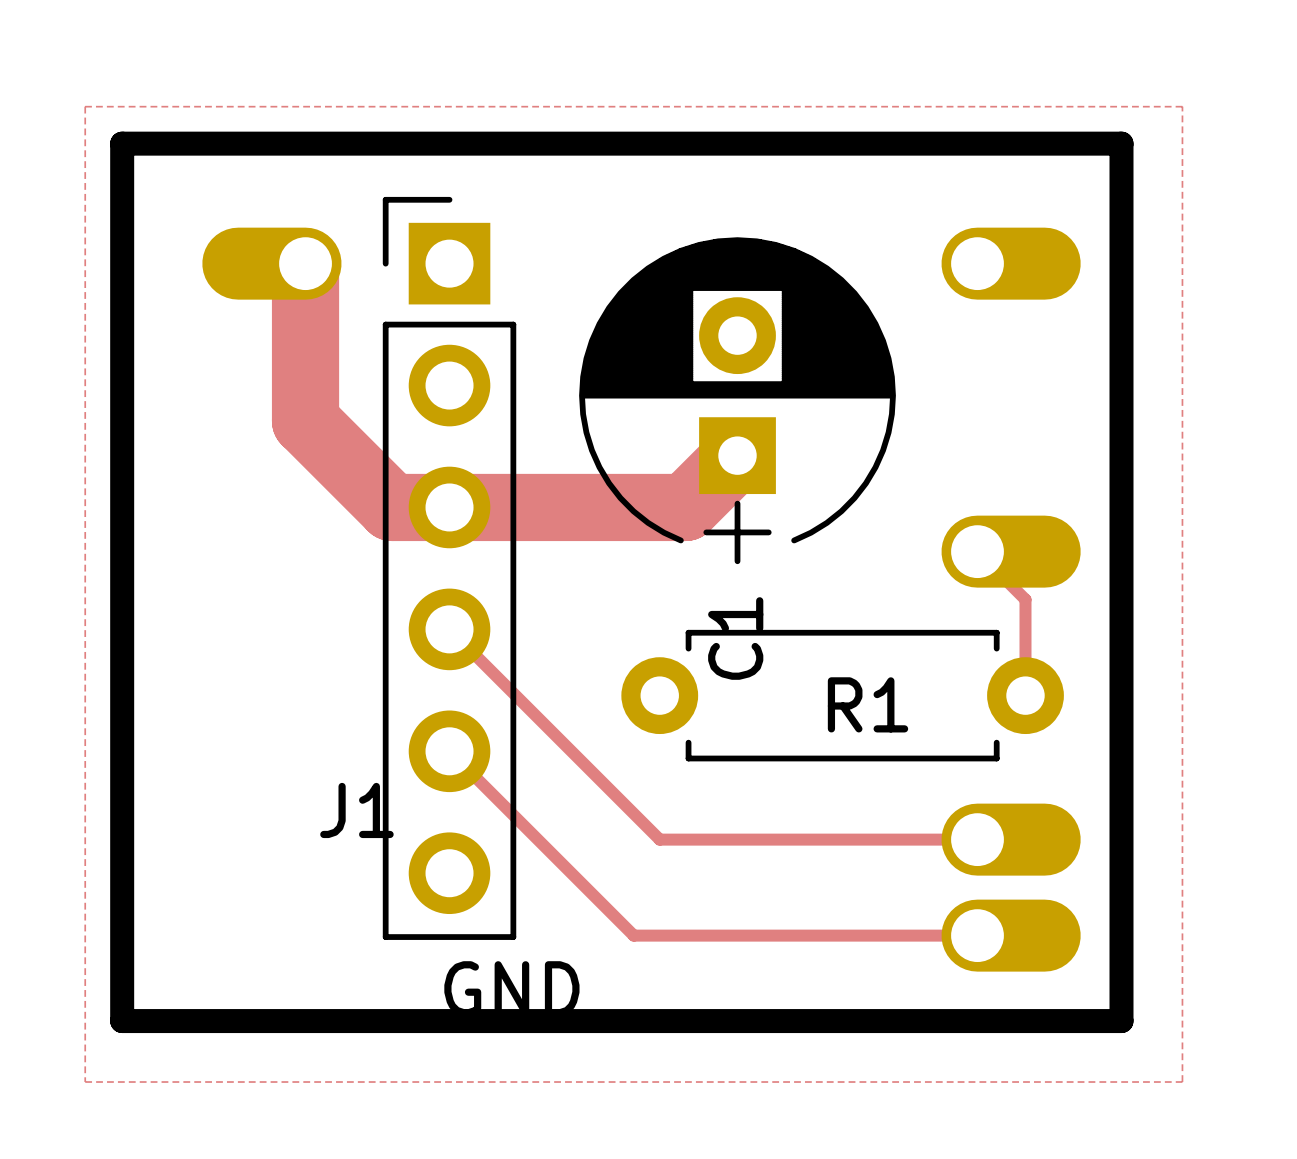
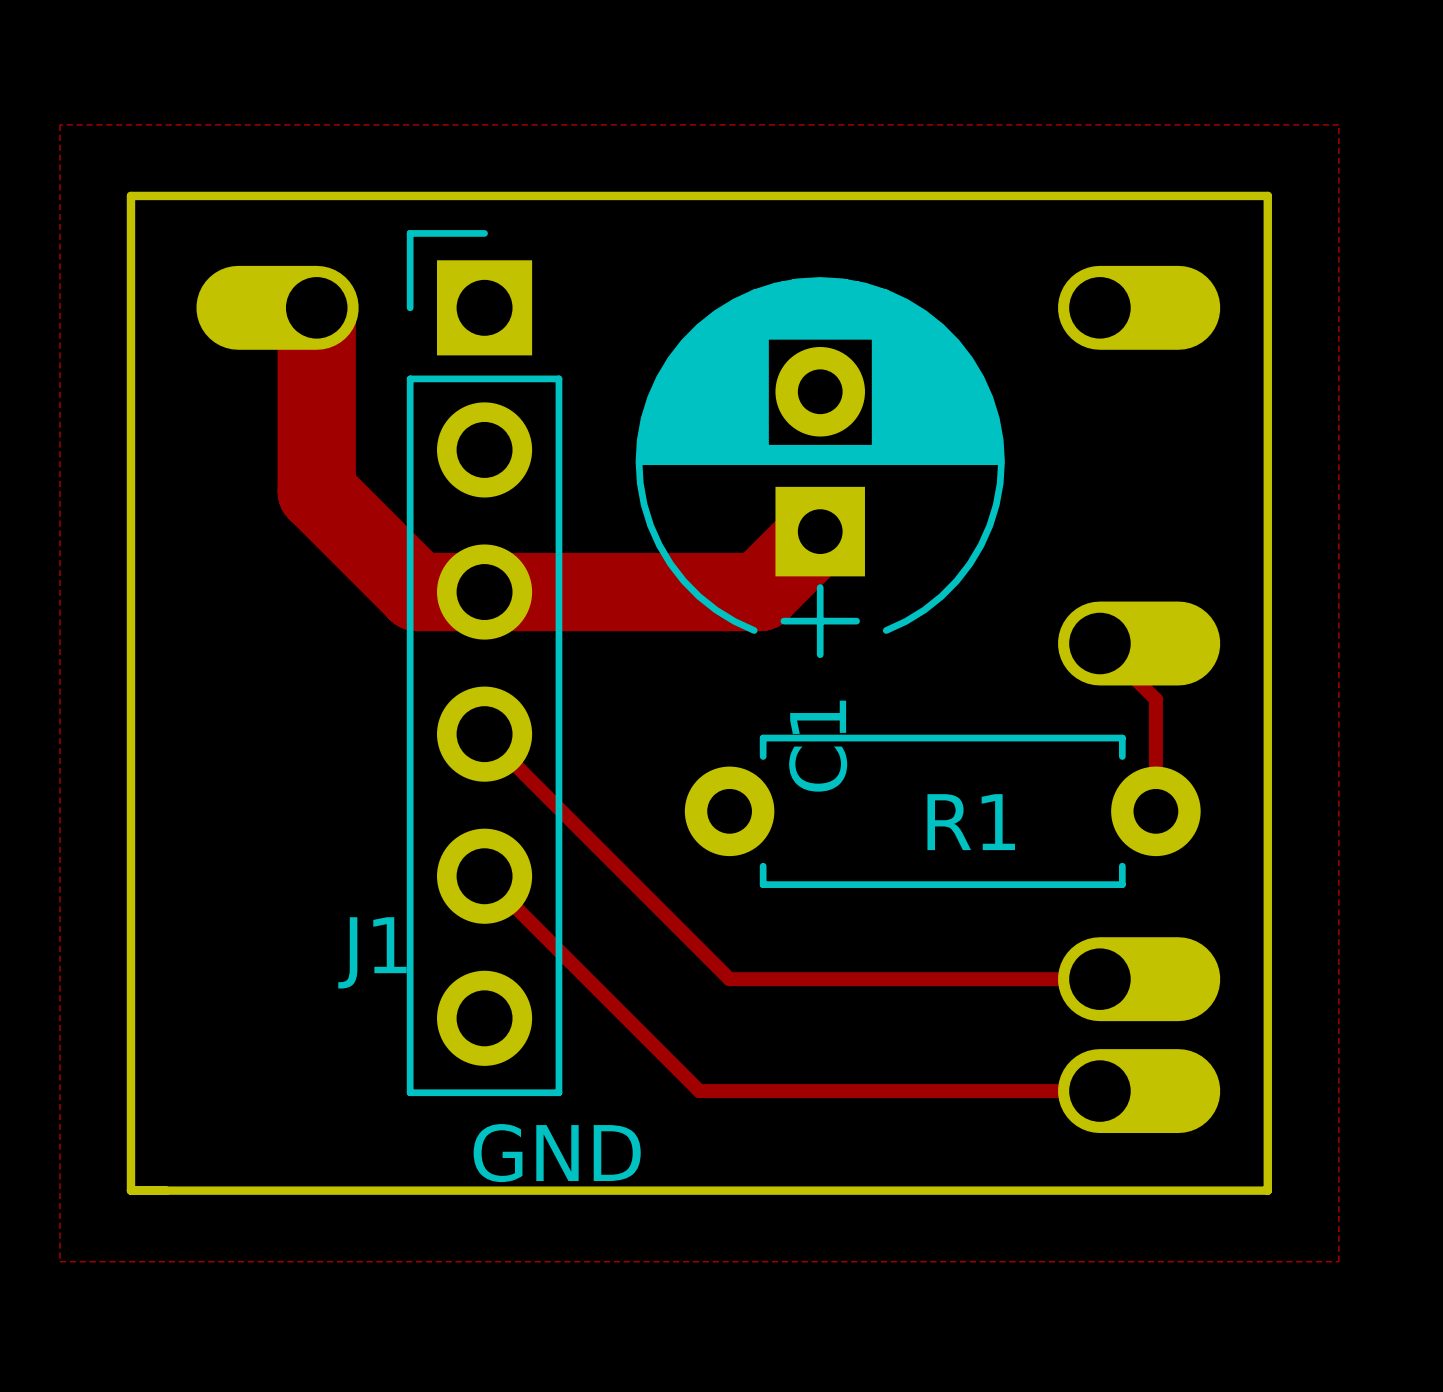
board edge: (1121, 167) (1121, 143) (122, 143) (122, 1021) (176, 1021) -> (1267, 195) (130, 195) (130, 1190)
board edge width: thick (1121, 167) (1121, 1021) (176, 1021) -> thin (1267, 195) (1267, 1190) (166, 1190)

